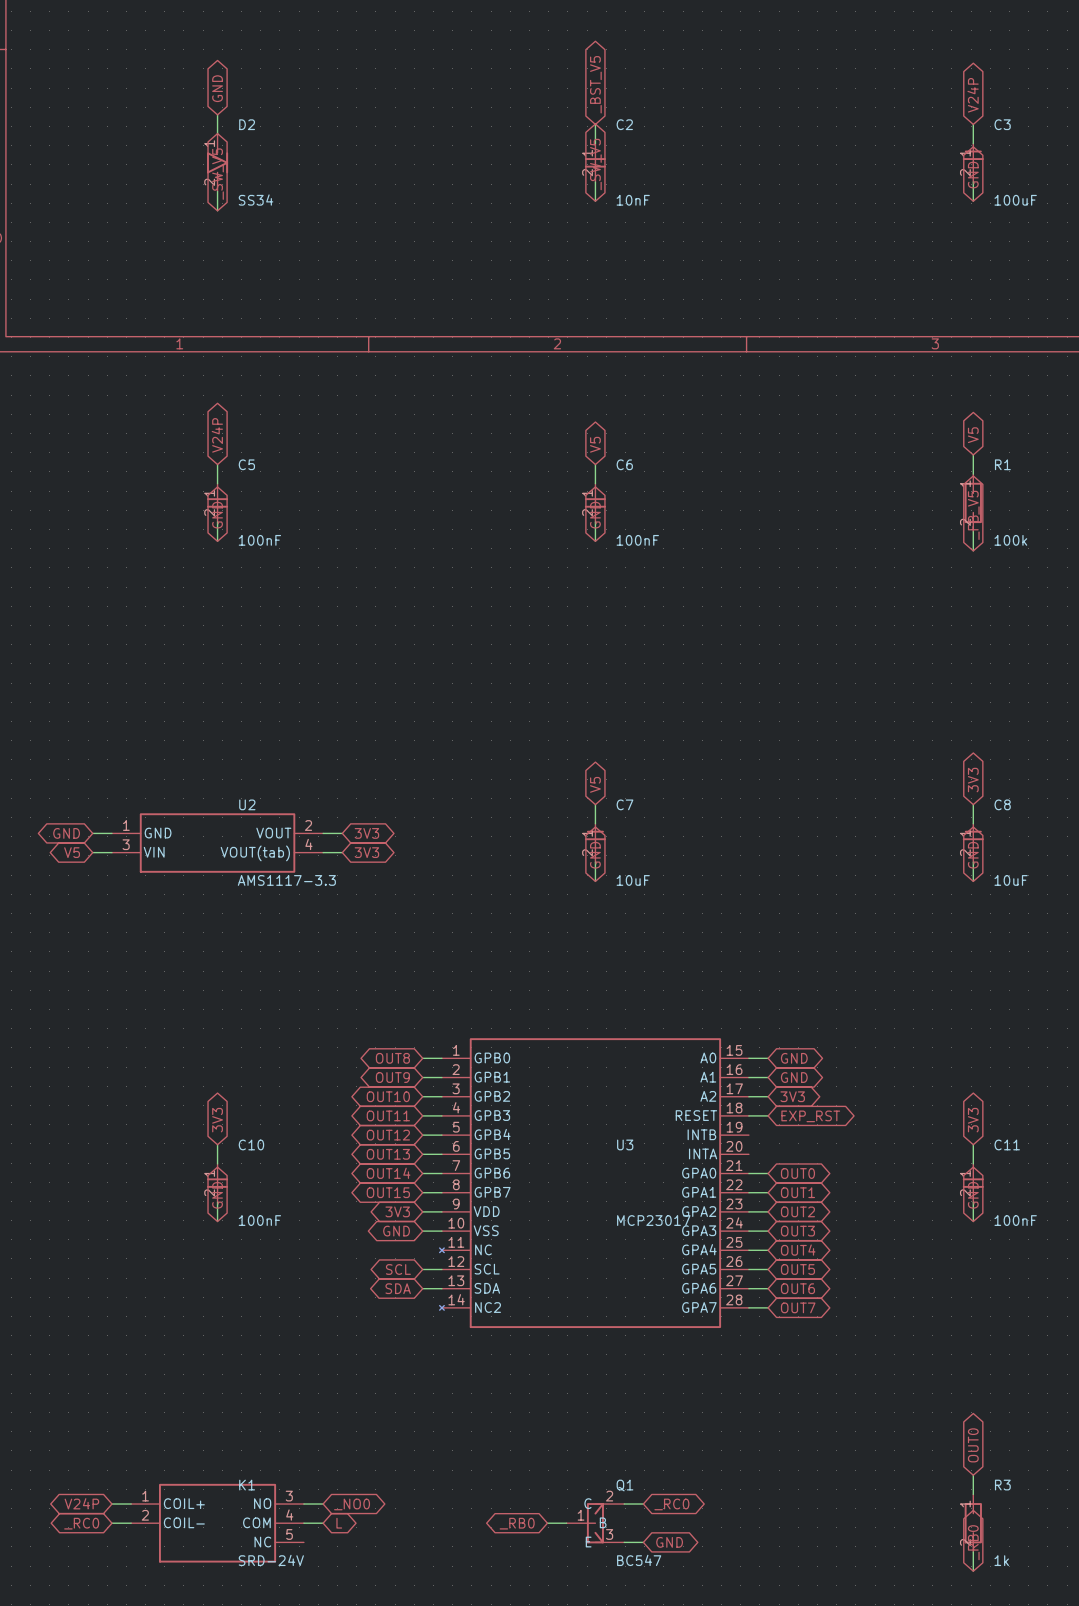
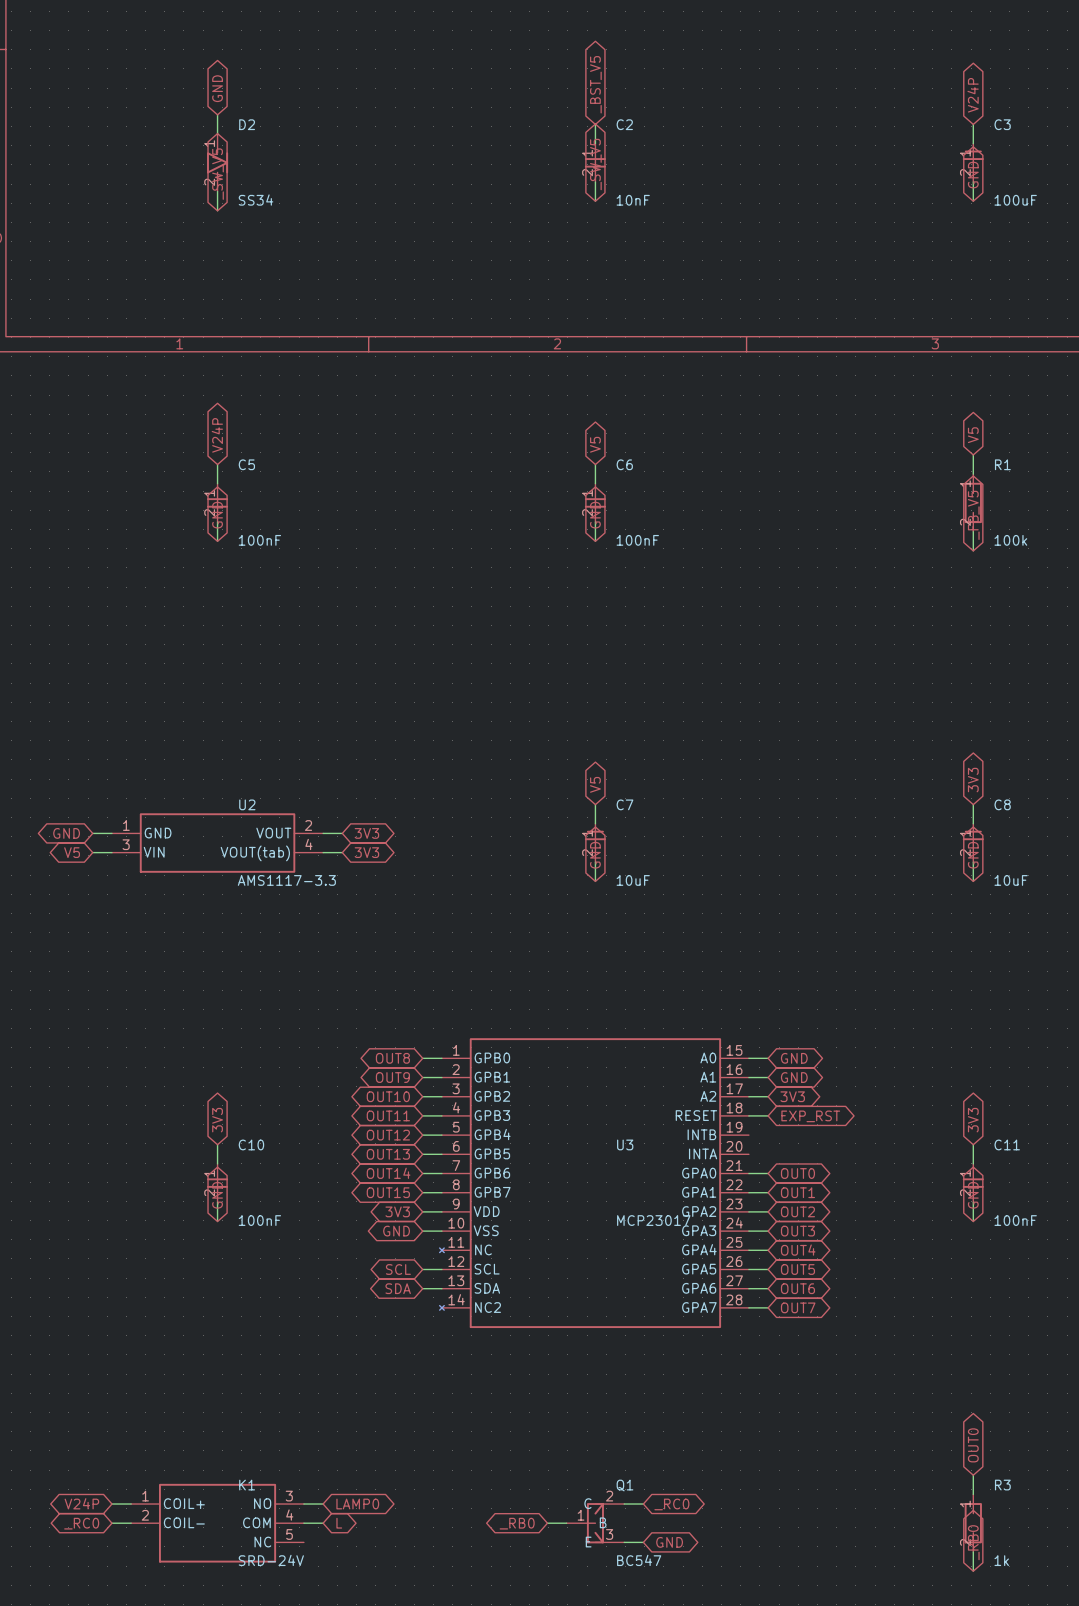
global label: _NO0 (352, 1504) -> LAMP0 (357, 1504)

